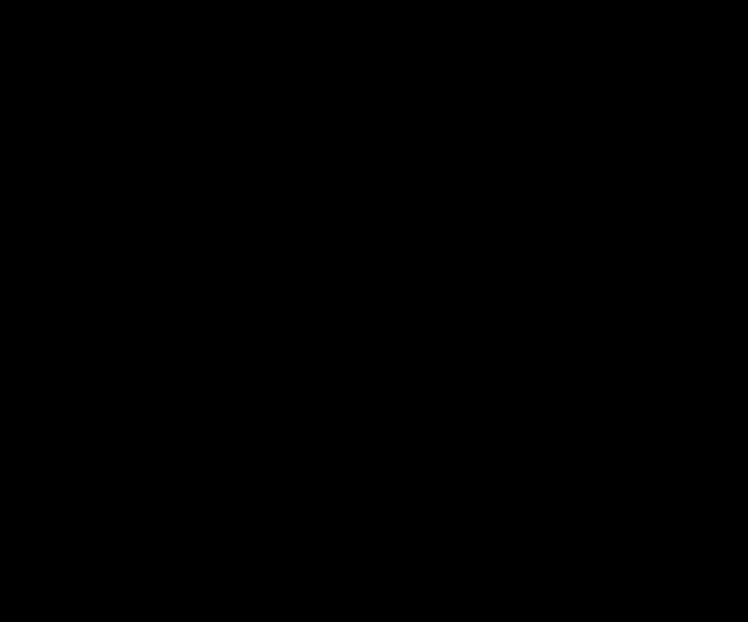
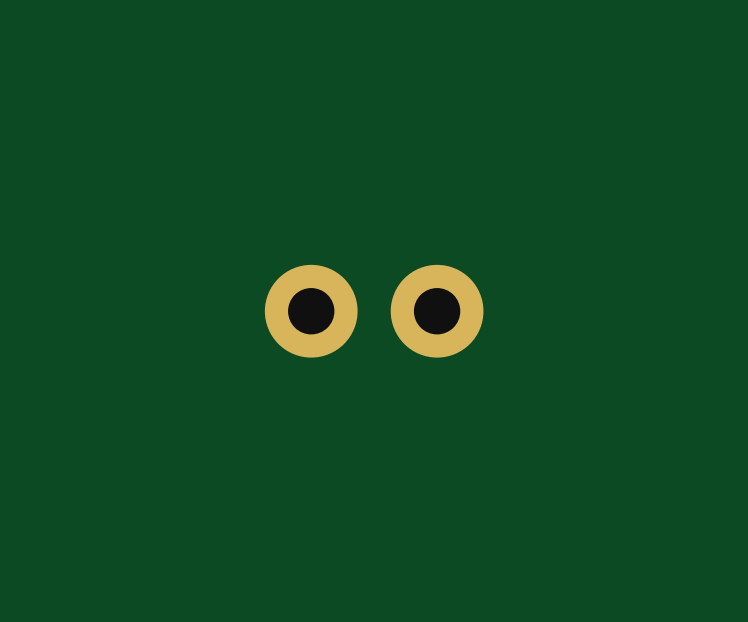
part: none -> (374, 311)

